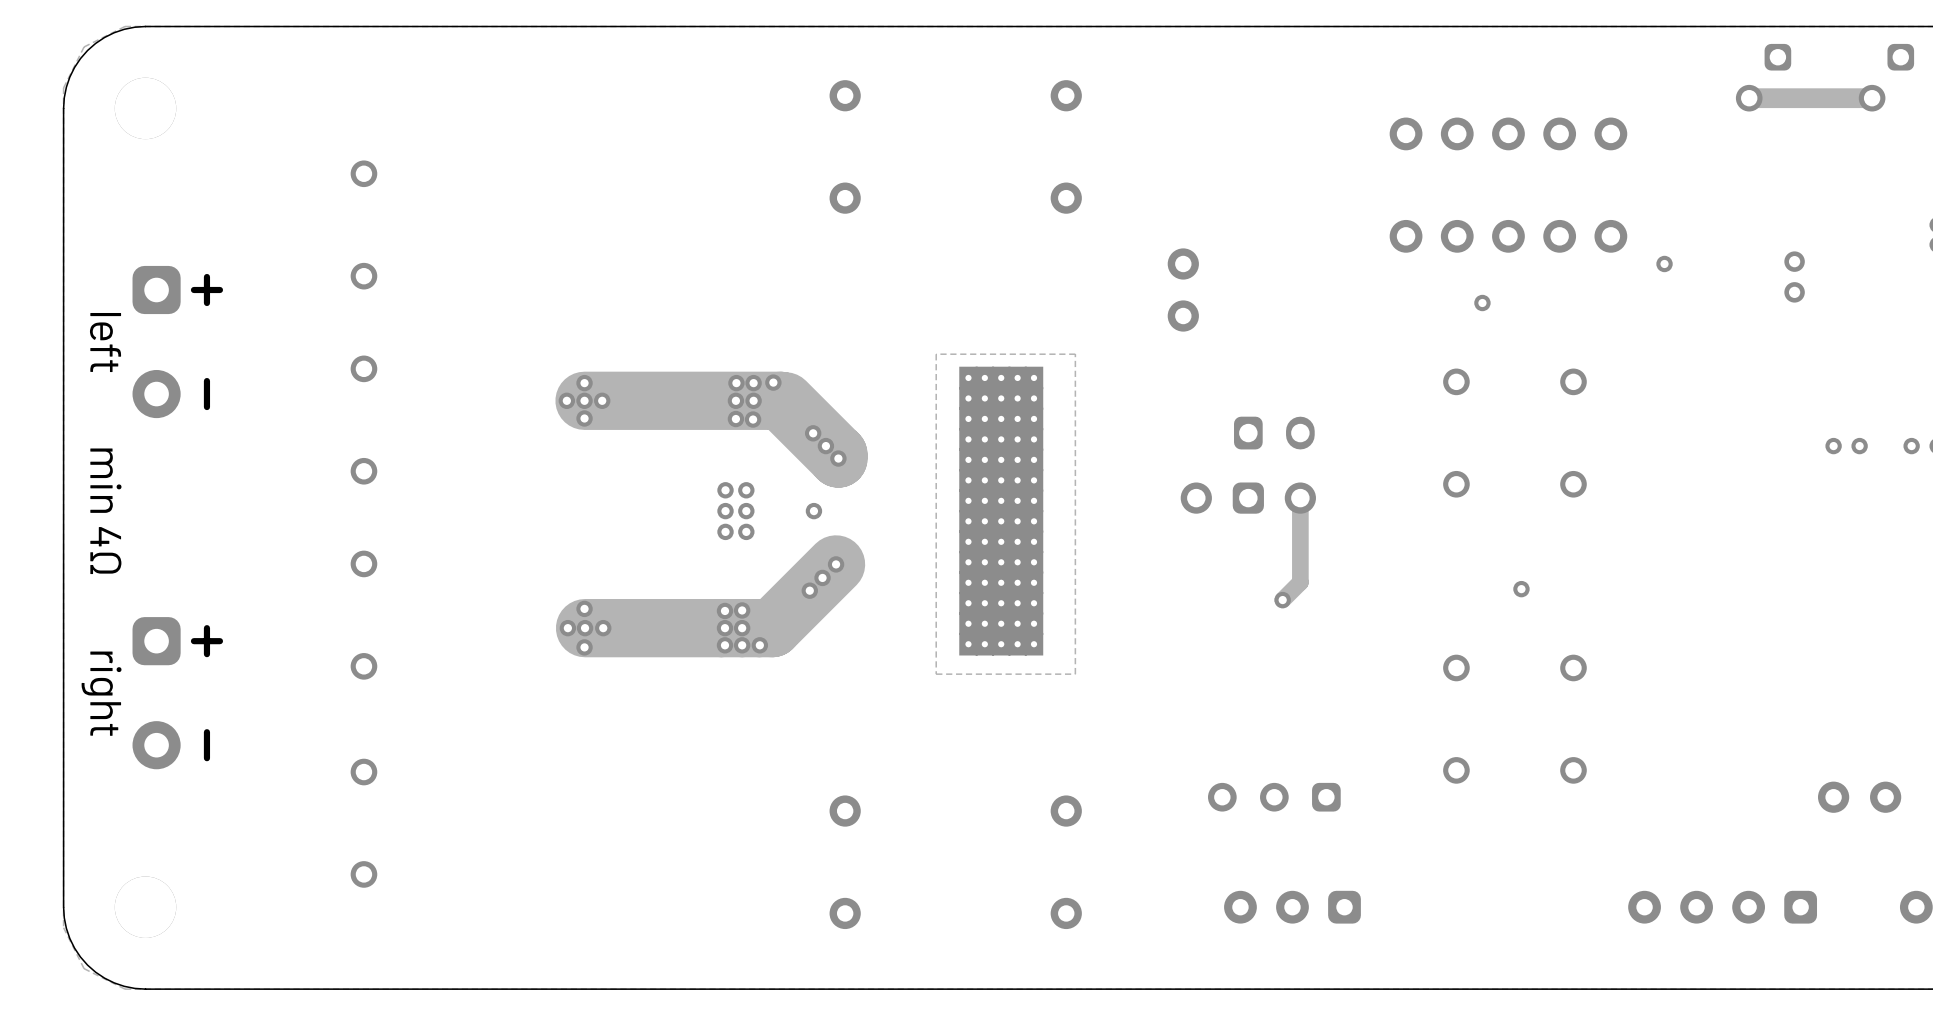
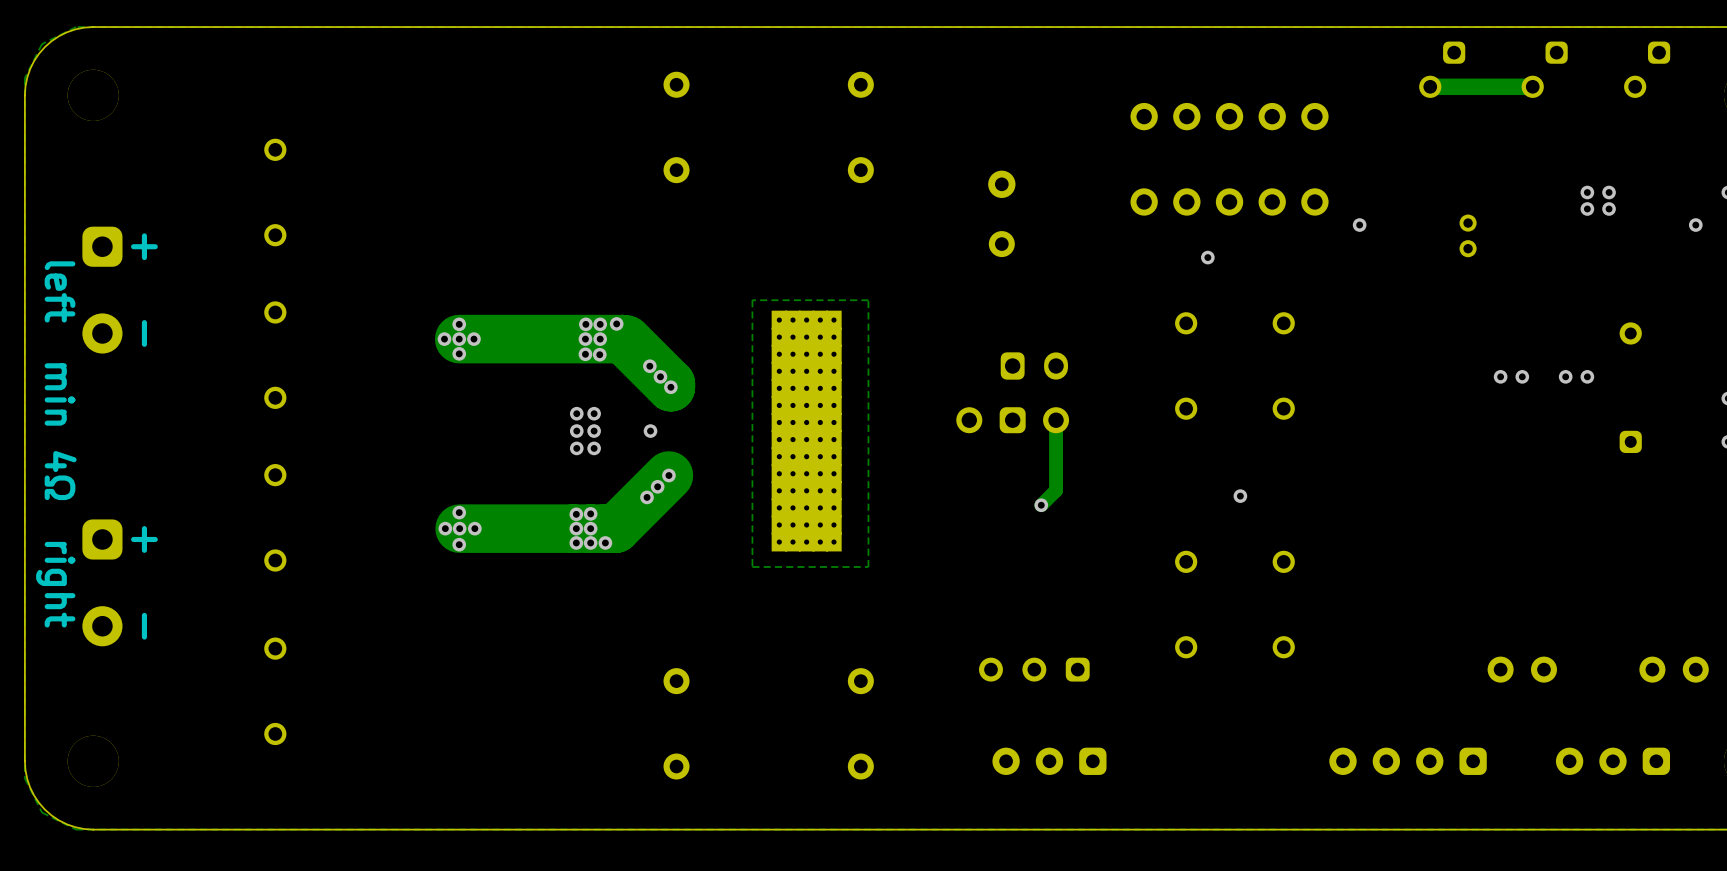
part: none -> (1001, 213)
part: (1183, 290) -> none

